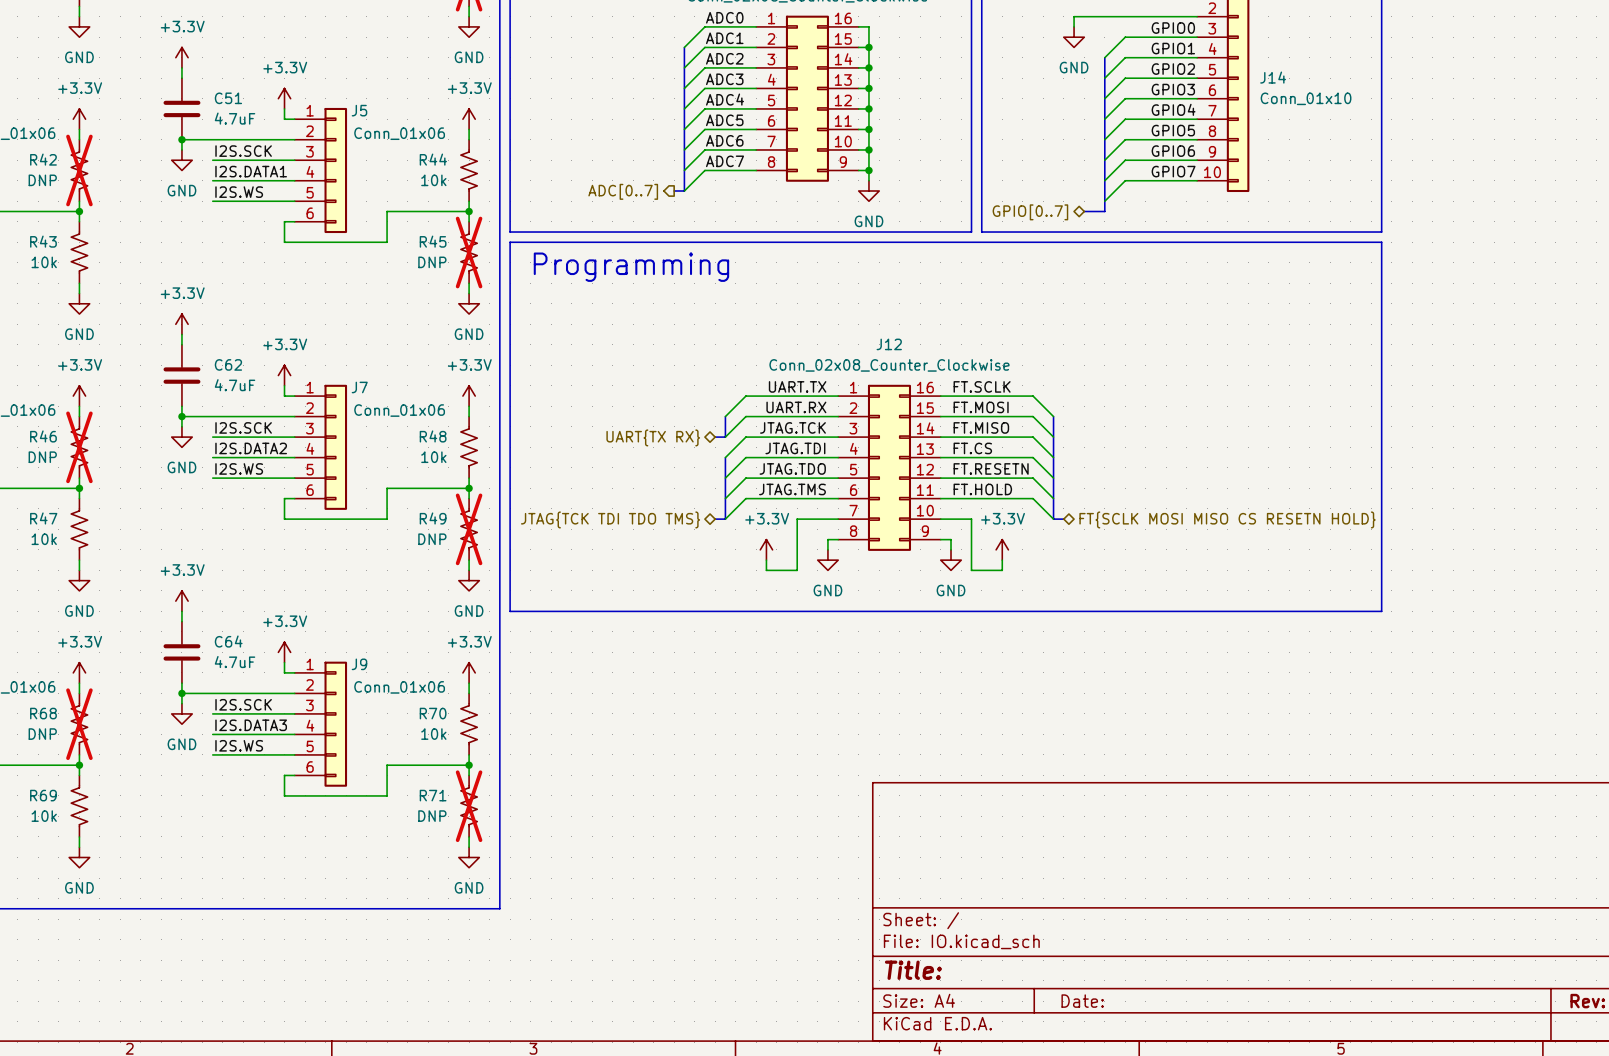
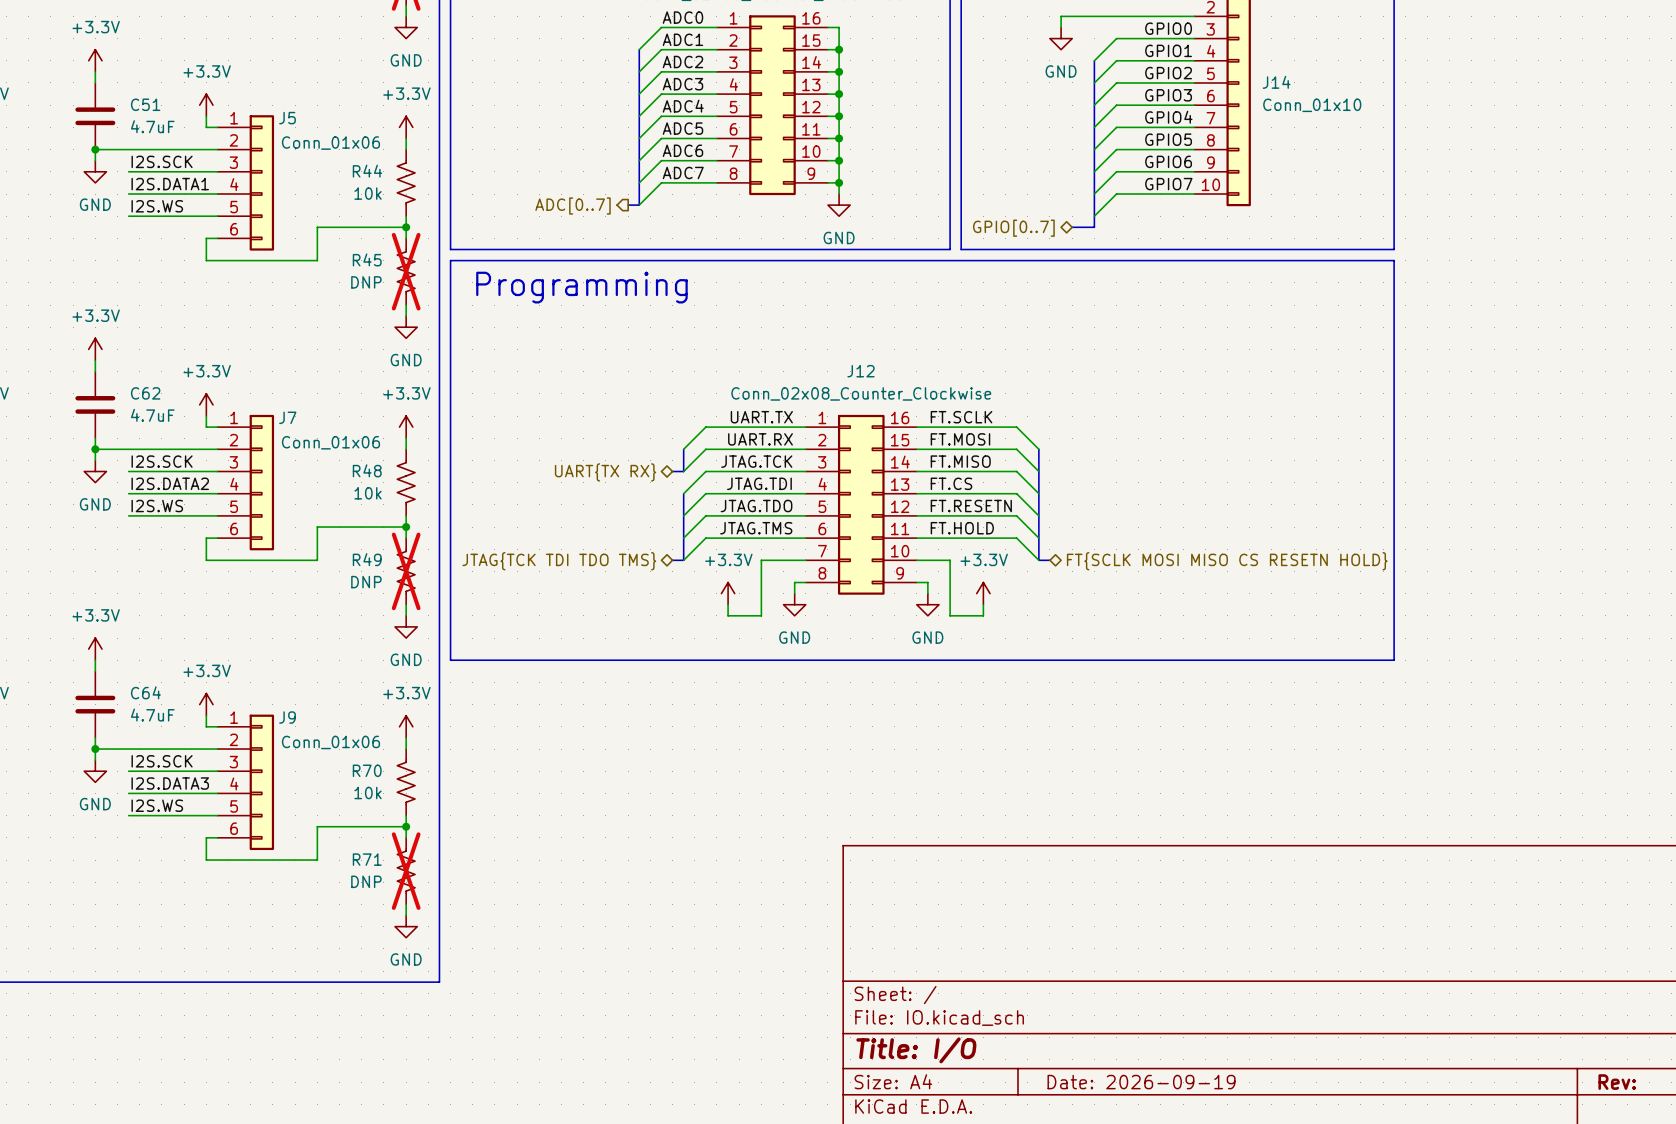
title block: Title: (913, 970) -> Title: I/O (916, 1050)
title block: Date: (1082, 1001) -> Date: 2026-09-19 (1141, 1082)

